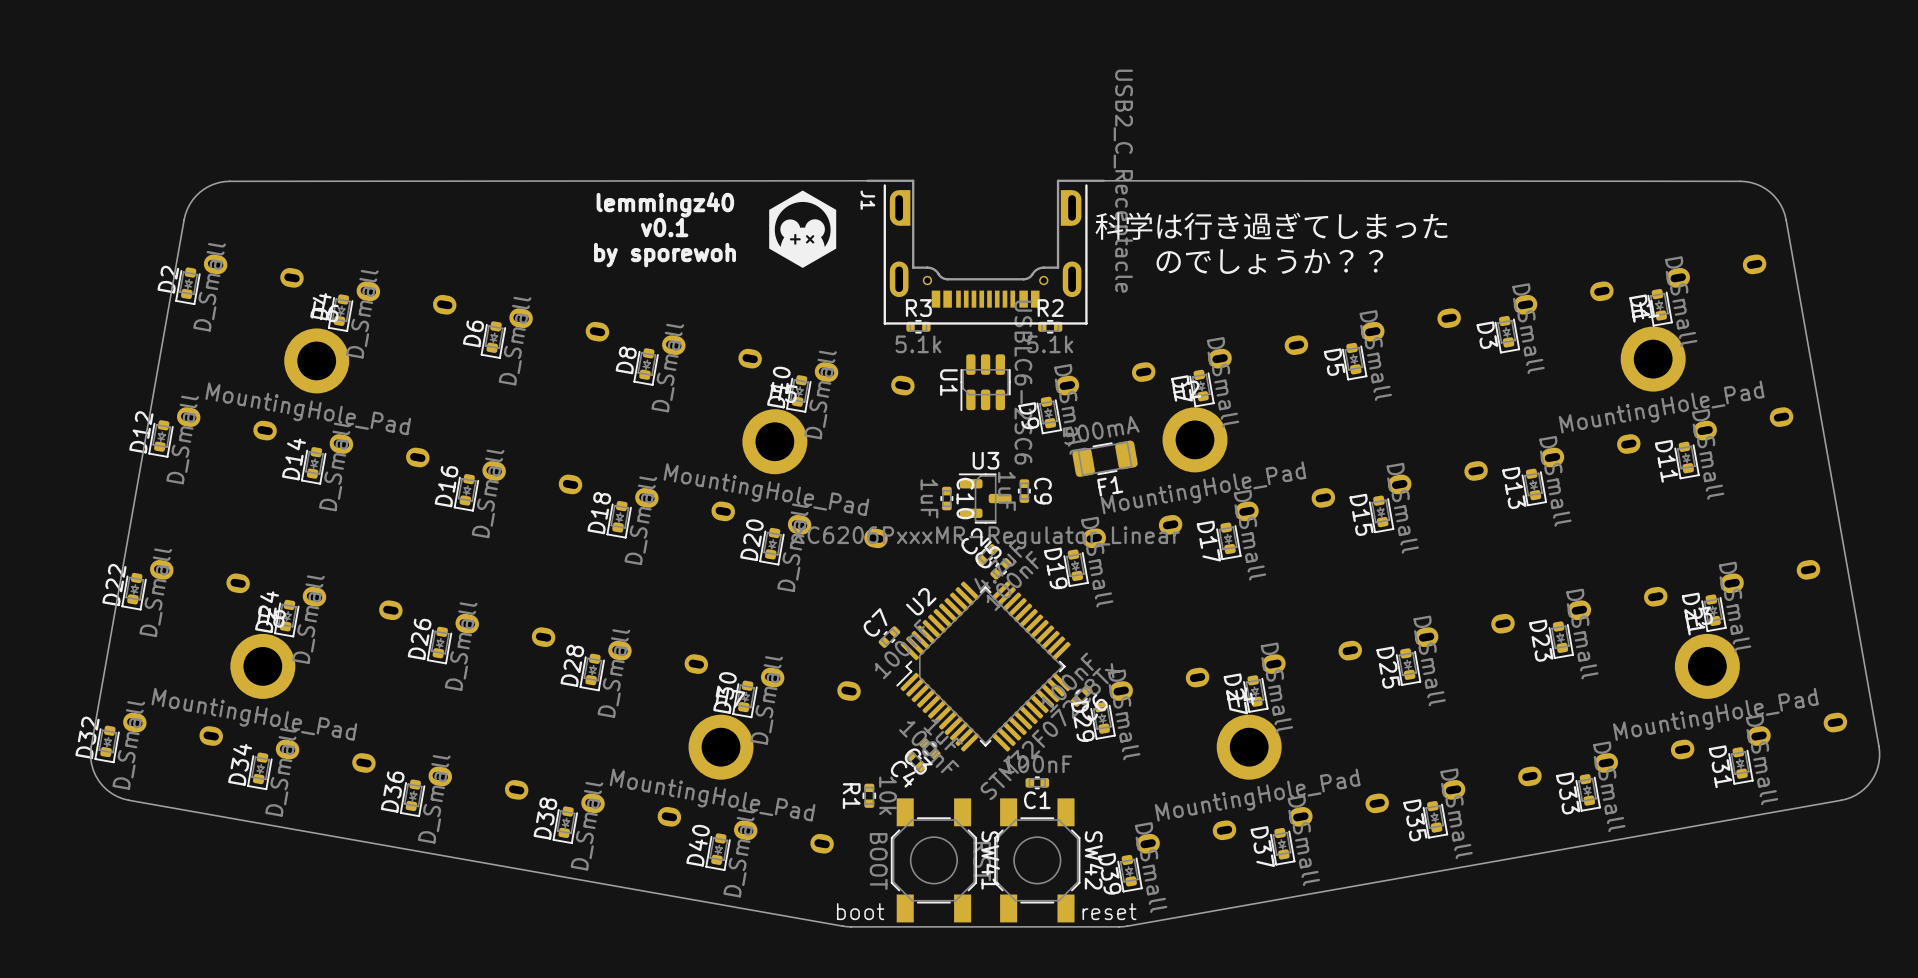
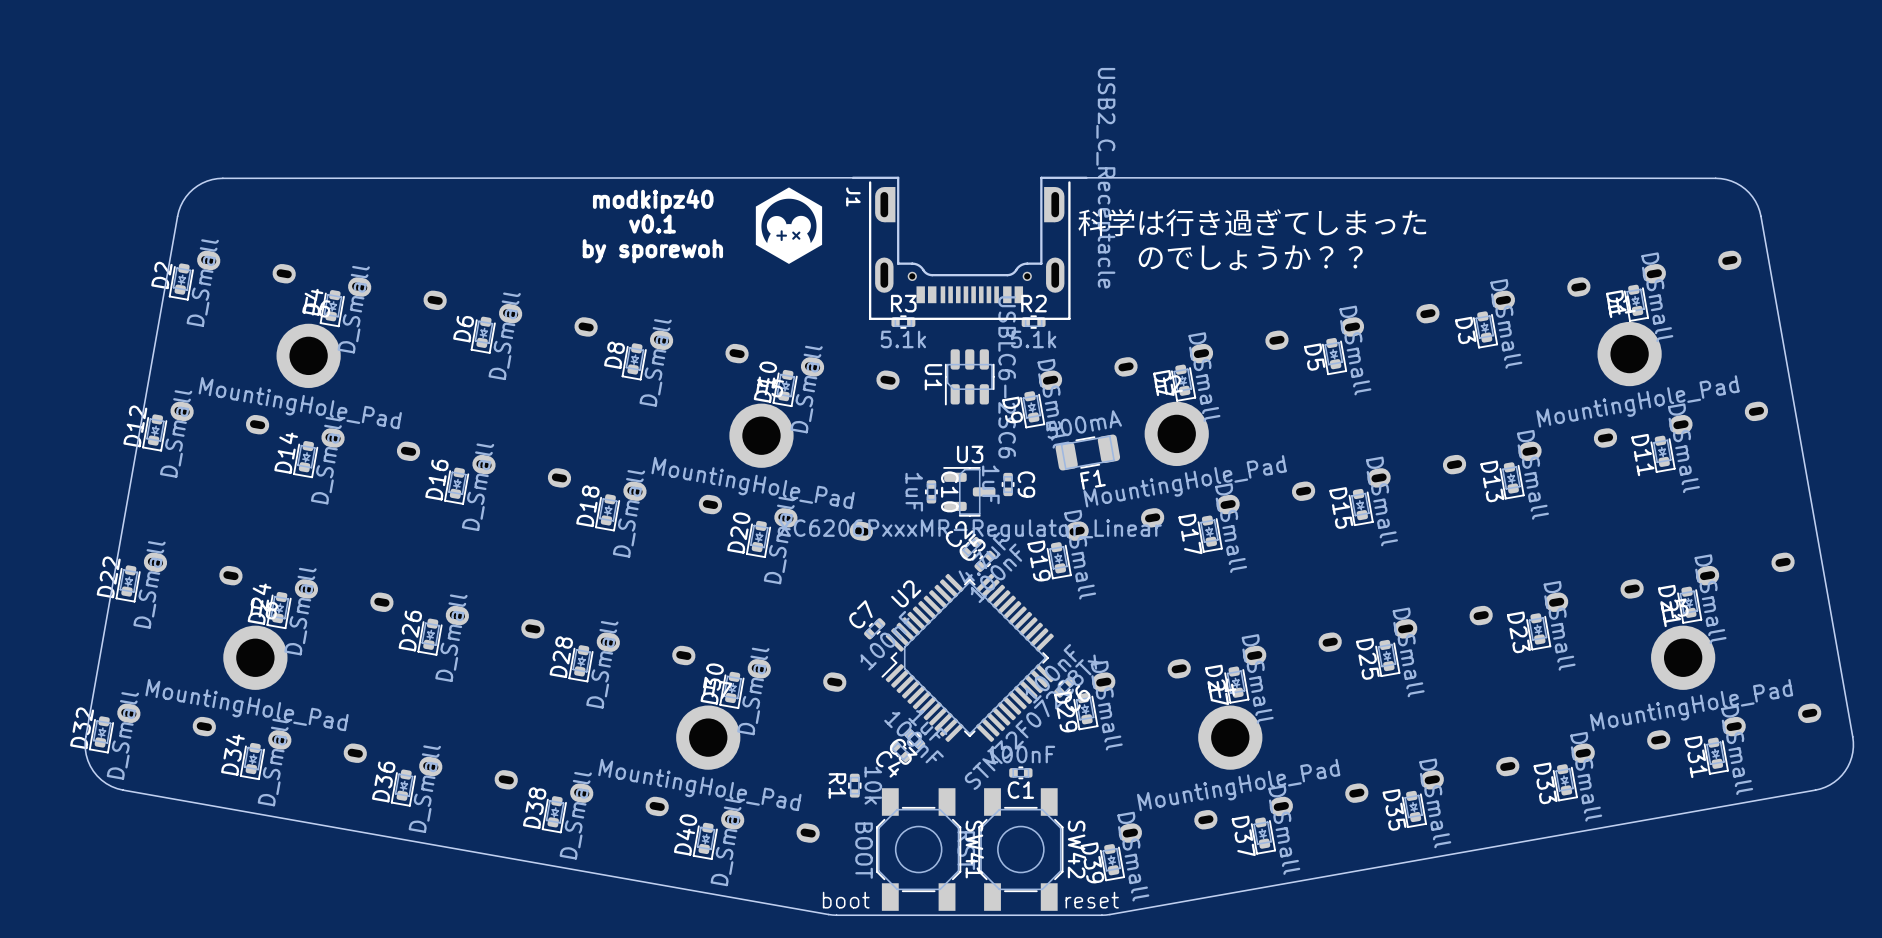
text: lemmingz40 (665, 204) -> modkipz40 (653, 201)

